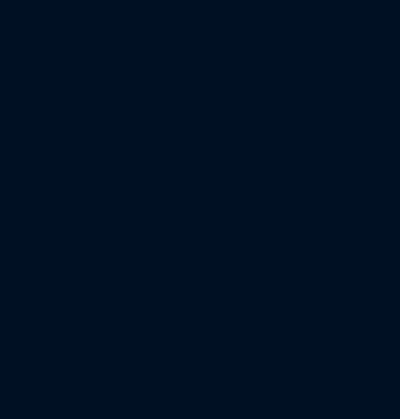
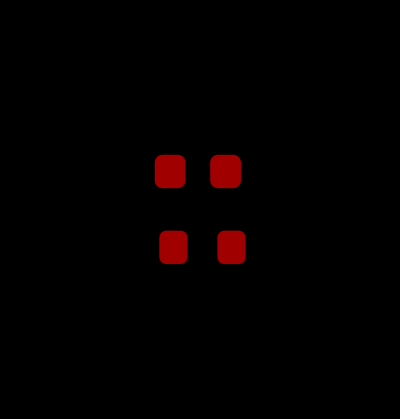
part: none -> (197, 171)
part: none -> (202, 247)

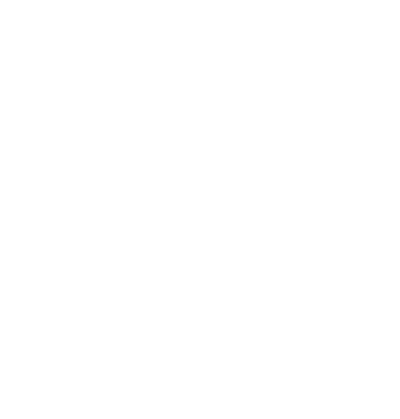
part: (197, 171) -> none
part: (202, 247) -> none

